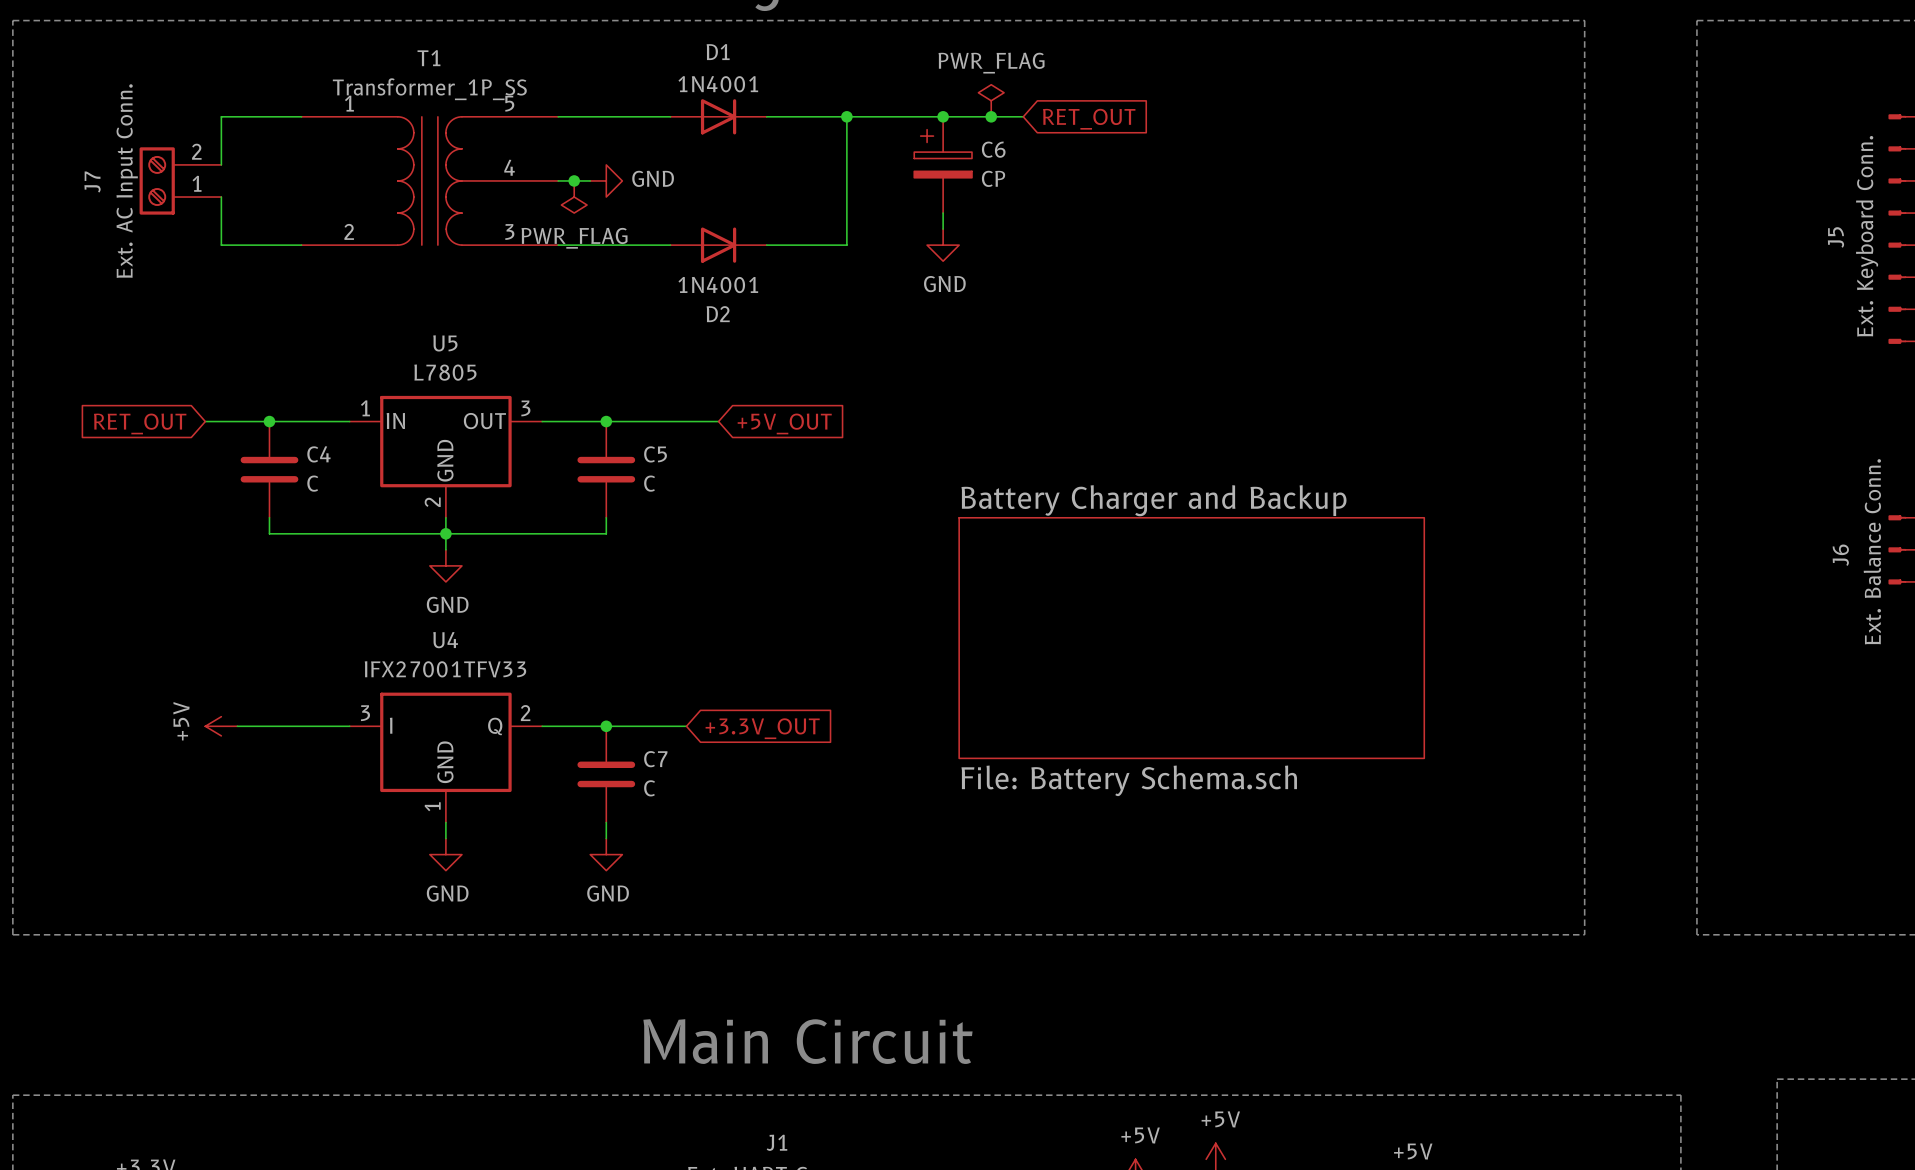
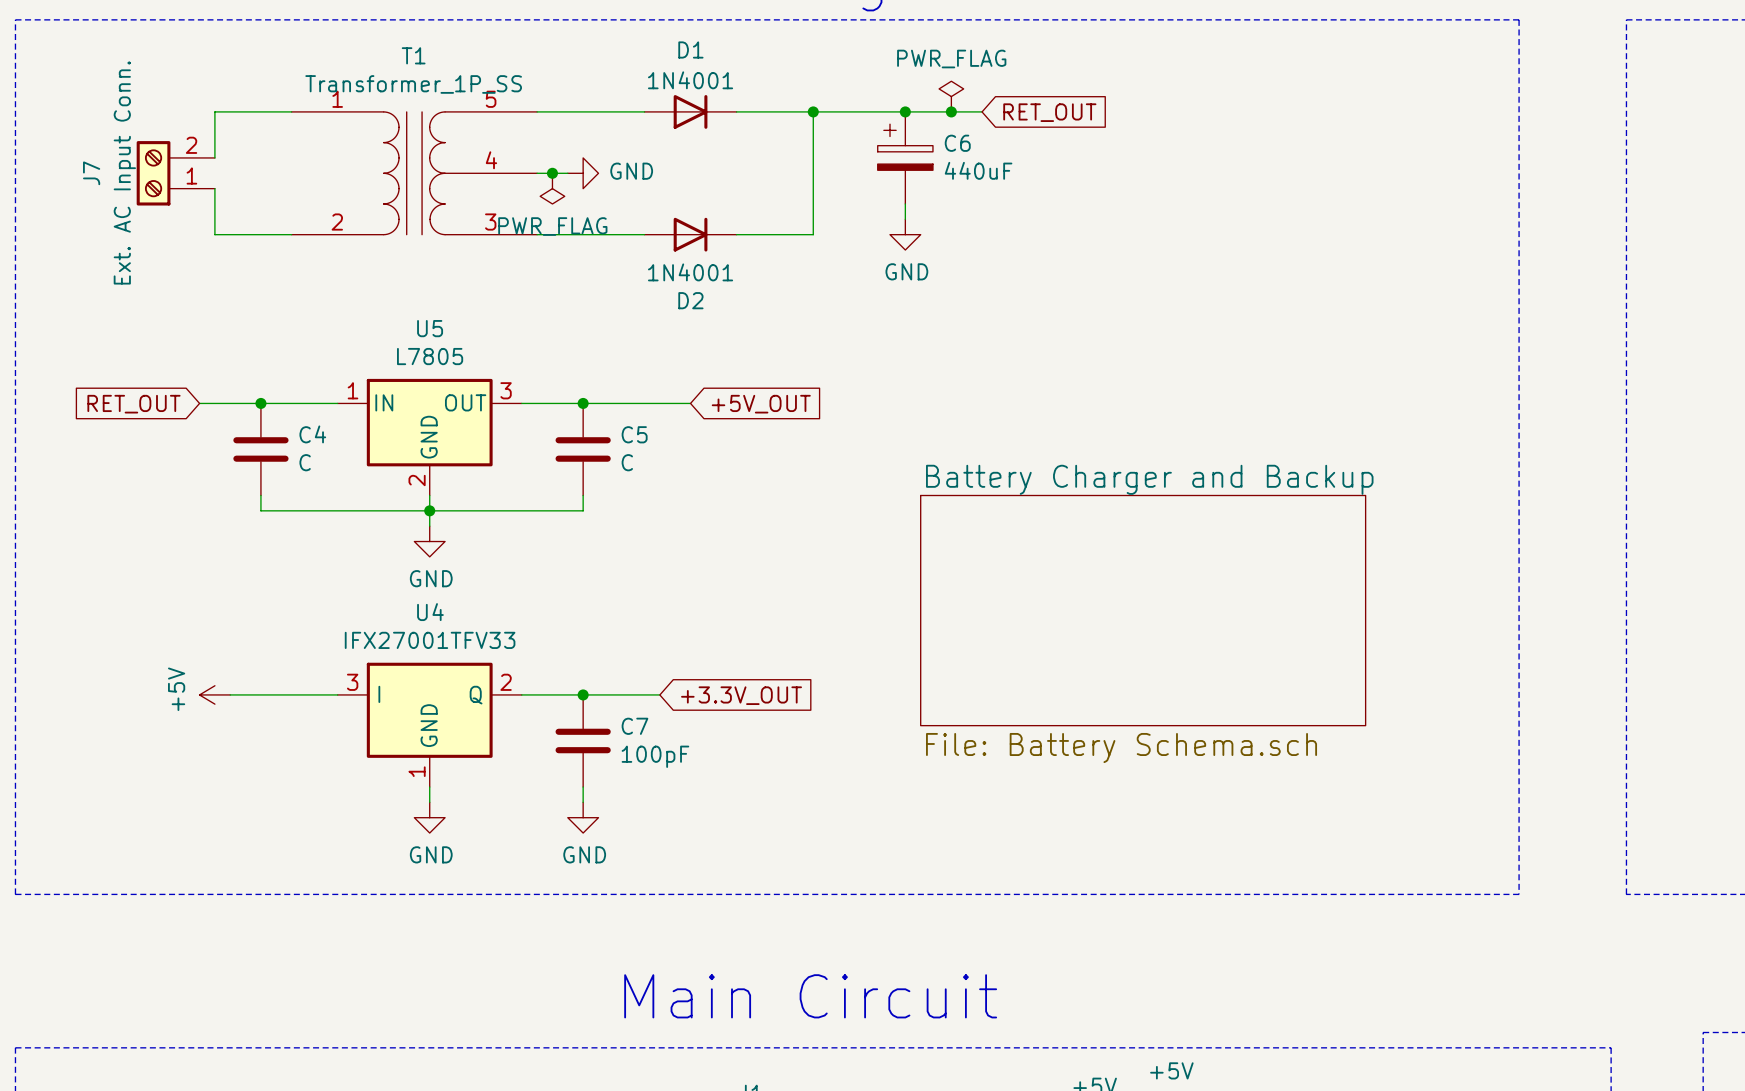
C6 value: CP (993, 178) -> 440uF (978, 170)
C7 value: C (649, 788) -> 100pF (655, 756)

